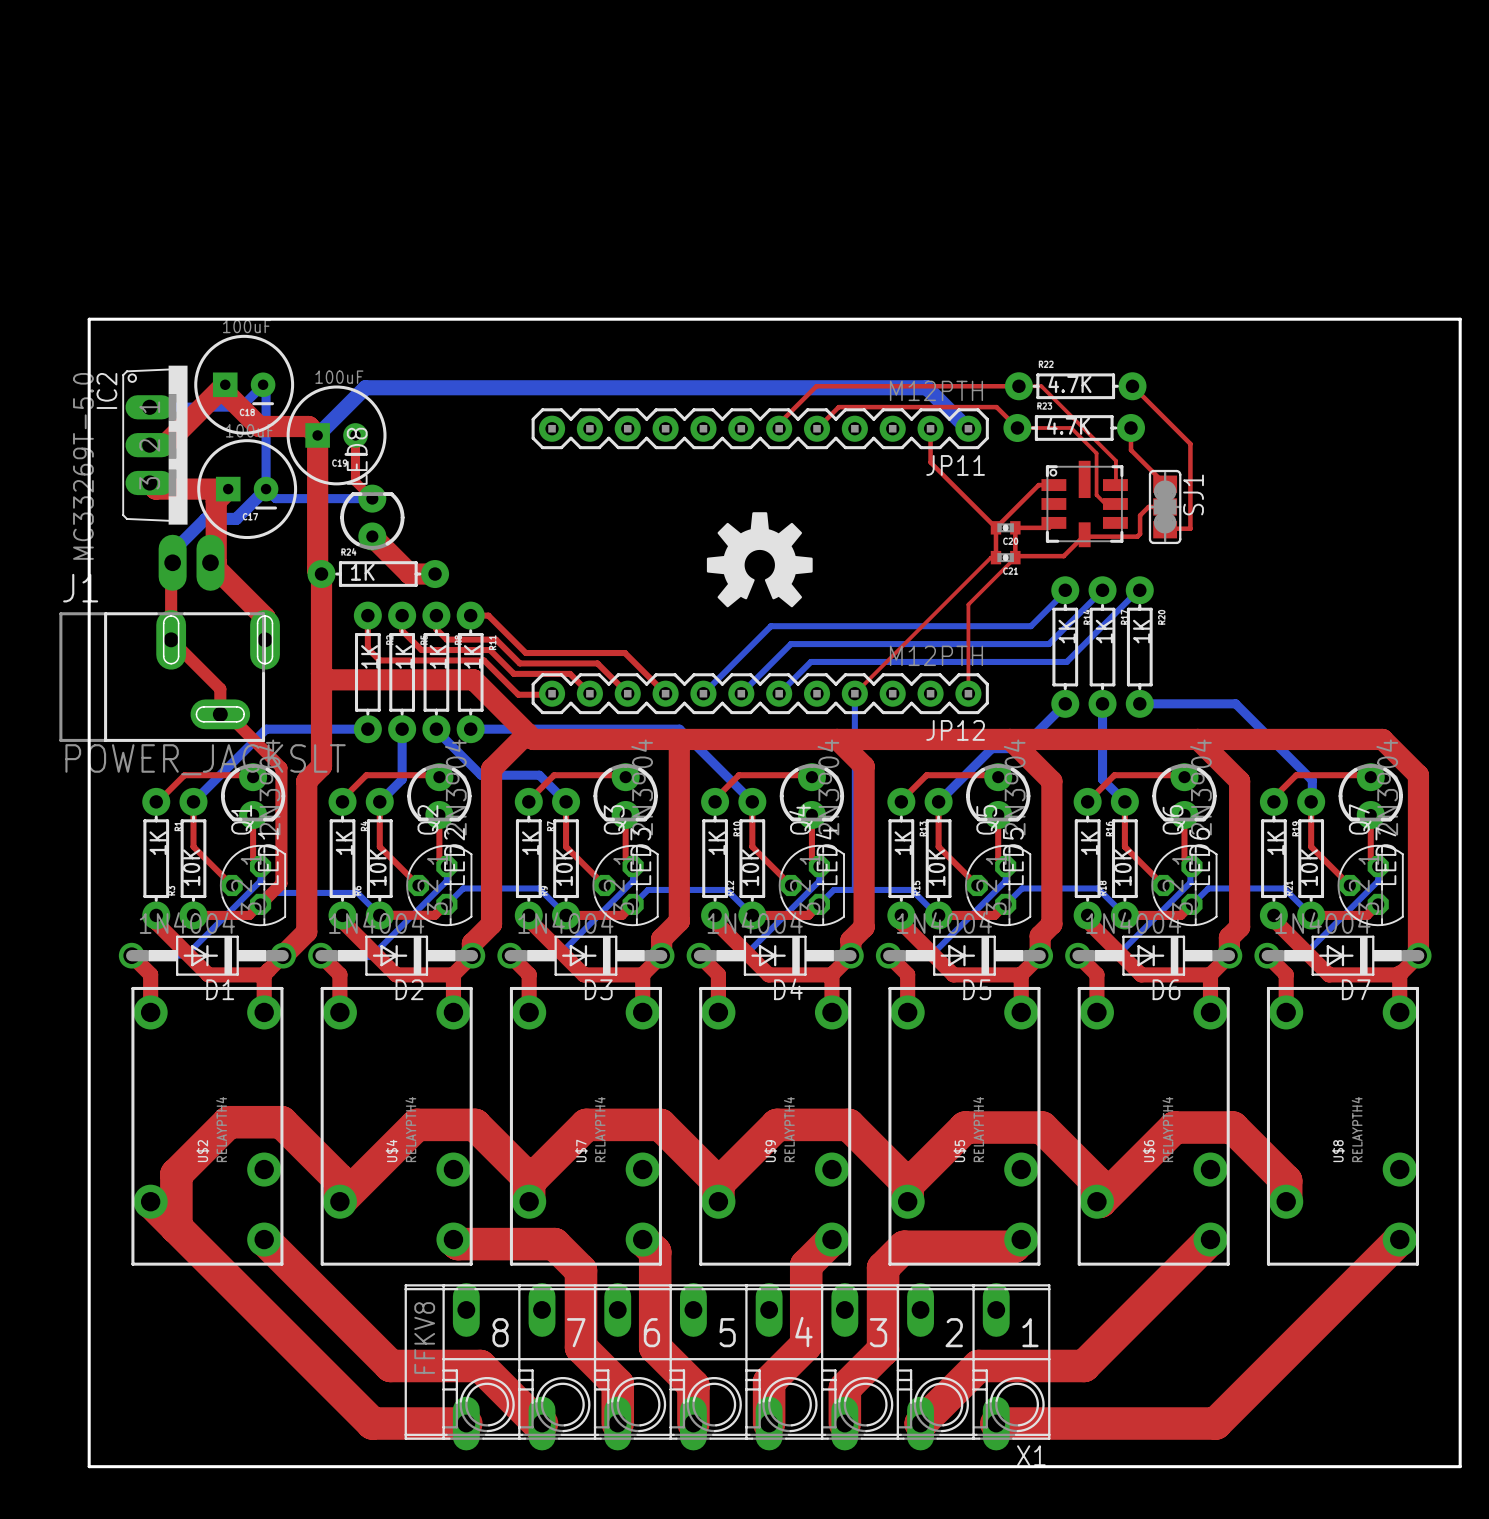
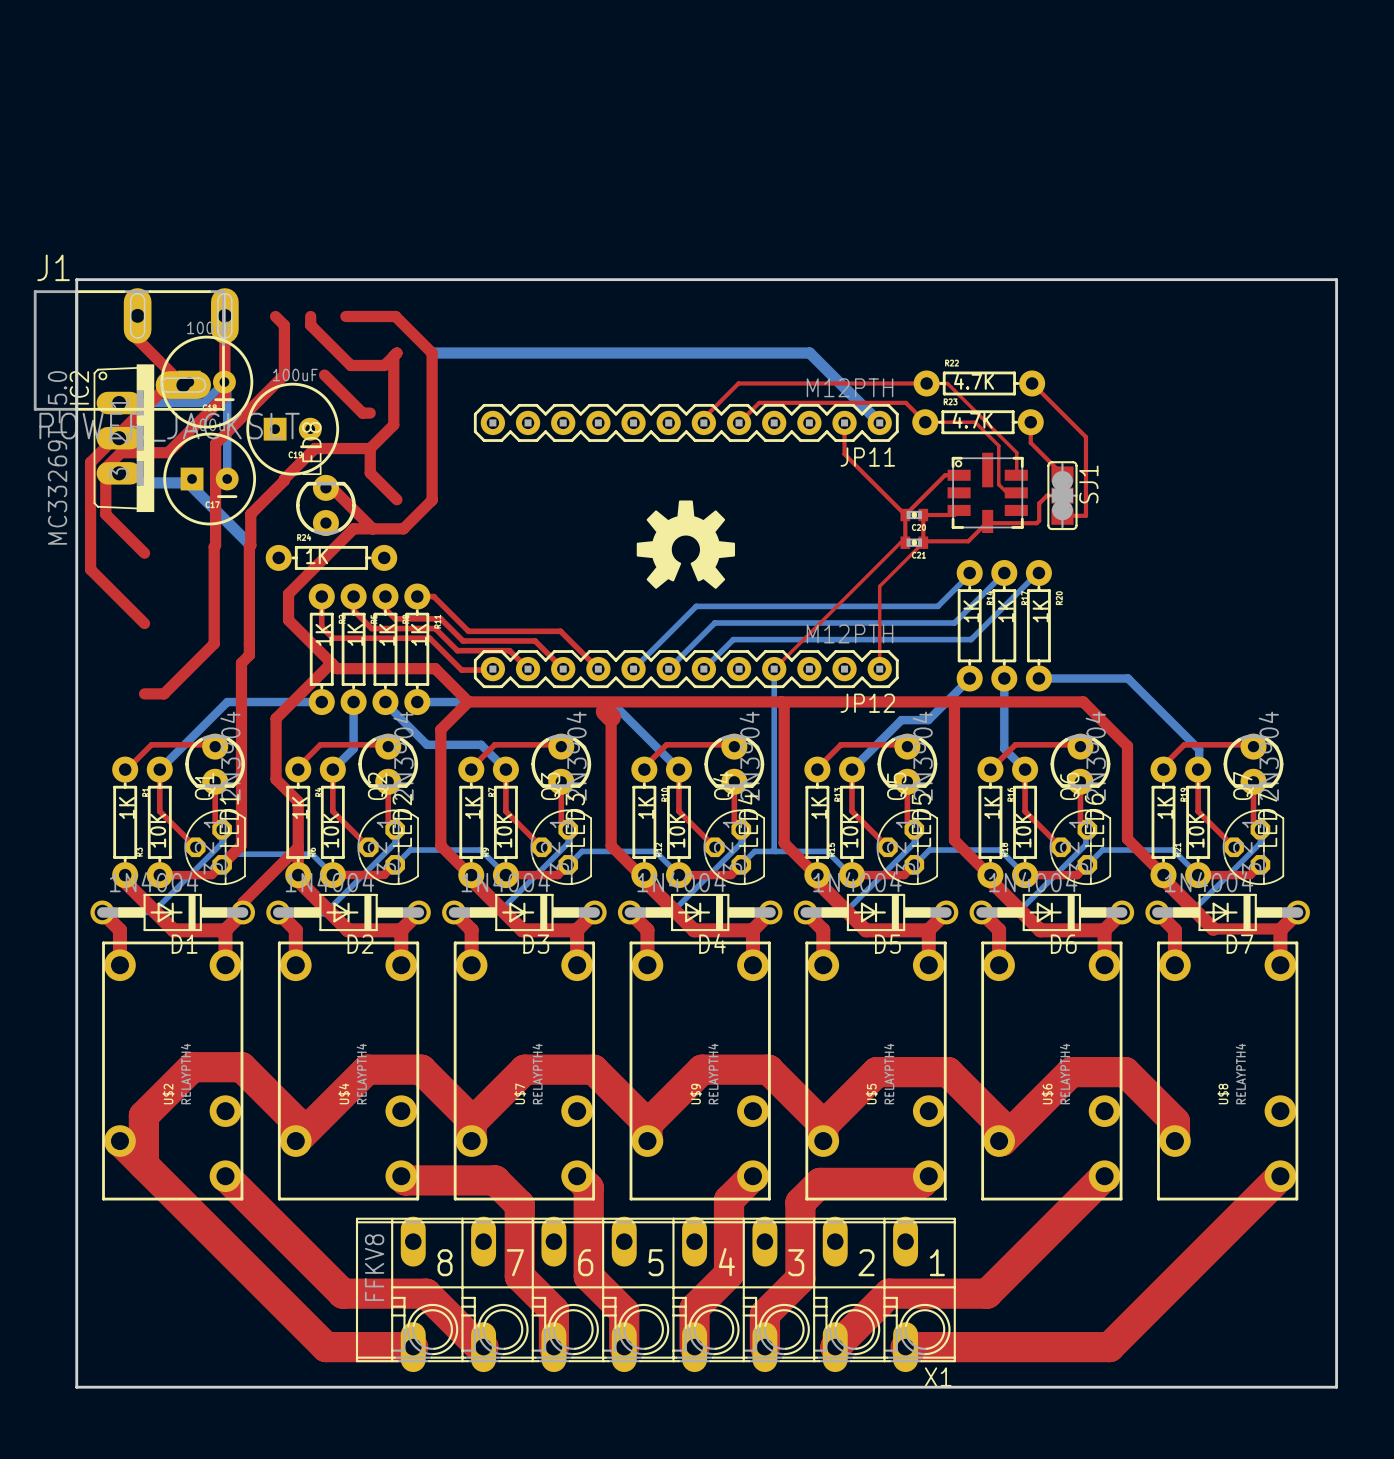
top track: none -> (137, 315) (137, 339) (183, 385) (167, 385) (90, 462) (90, 569) (144, 623)
top track: none -> (224, 315) (224, 395) (168, 452) (121, 452) (105, 467) (105, 514) (144, 553)
top track: none -> (275, 316) (284, 325) (284, 375) (215, 443) (214, 643) (164, 693) (144, 693)
top track: none -> (310, 316) (310, 325) (350, 365) (384, 365) (396, 353)
top track: none -> (345, 316) (395, 316) (432, 353) (432, 500) (403, 528) (353, 528) (288, 593) (288, 620) (337, 668) (435, 668) (468, 701)
board edge: (1460, 319) (89, 319) (89, 1466) (104, 1466) -> (1336, 321) (1336, 279) (76, 279) (76, 1387)
top track: none -> (393, 356) (393, 425) (370, 448)
top track: none -> (324, 375) (362, 413) (370, 413)
bottom track: (968, 428) (926, 387) (365, 387) (317, 435) -> (879, 422) (809, 353) (432, 353)
top track: (355, 435) (355, 481) (372, 498) -> none
top track: (149, 445) (164, 445) (225, 384) (225, 392) (259, 426) (308, 426) (317, 435) (317, 570) (321, 574) (321, 766) (306, 781) (306, 932) (283, 955) -> (298, 847) (243, 902) (243, 912)
top track: none -> (370, 448) (370, 473) (396, 499)
top track: (149, 483) (155, 489) (228, 489) (216, 501) (216, 562) (210, 562) (265, 617) (265, 639) -> none
top track: none -> (324, 480) (372, 528)
bottom track: none -> (144, 482) (188, 482) (250, 545)
bottom track: (372, 498) (275, 498) (266, 489) (236, 518) (205, 518) (172, 551) (172, 562) -> none
top track: (372, 536) (409, 574) (435, 574) -> none
top track: (172, 562) (171, 639) (220, 689) (220, 714) (228, 714) (281, 767) -> (370, 448) (314, 448) (250, 514) (249, 655) (241, 663) (241, 737)
part: (191, 562) -> none
top track: (321, 673) (327, 679) (473, 679) (533, 739) (1382, 739) (1418, 775) (1418, 954) (1399, 974) (1327, 973) -> (1280, 930) (1213, 928)
J1 position: (169, 675) -> (136, 349)
top track: none -> (331, 663) (276, 718) (276, 779) (298, 801) (298, 875)
top track: none -> (468, 701) (1083, 701) (1092, 711)
top track: none -> (468, 701) (440, 729) (440, 845) (471, 876)
top track: none -> (781, 701) (784, 704) (784, 843) (817, 876)
top track: none -> (954, 701) (954, 840) (990, 876)
top track: (527, 733) (491, 769) (491, 924) (472, 943) (472, 955) -> none
top track: (837, 739) (864, 766) (864, 927) (850, 940) (850, 955) -> none
top track: (1010, 739) (1051, 781) (1051, 924) (1040, 935) (1040, 955) -> none
top track width: thick (1197, 739) (1235, 776) -> thin (1092, 711) (1127, 746)
top track width: thick (679, 745) (679, 884) -> thin (611, 717) (611, 845)
top track: (1235, 776) (1239, 781) (1239, 927) (1229, 937) (1229, 955) -> (1127, 746) (1127, 839) (1163, 875)
top track: (679, 884) (679, 921) (661, 938) (661, 955) -> (611, 845) (644, 879)

